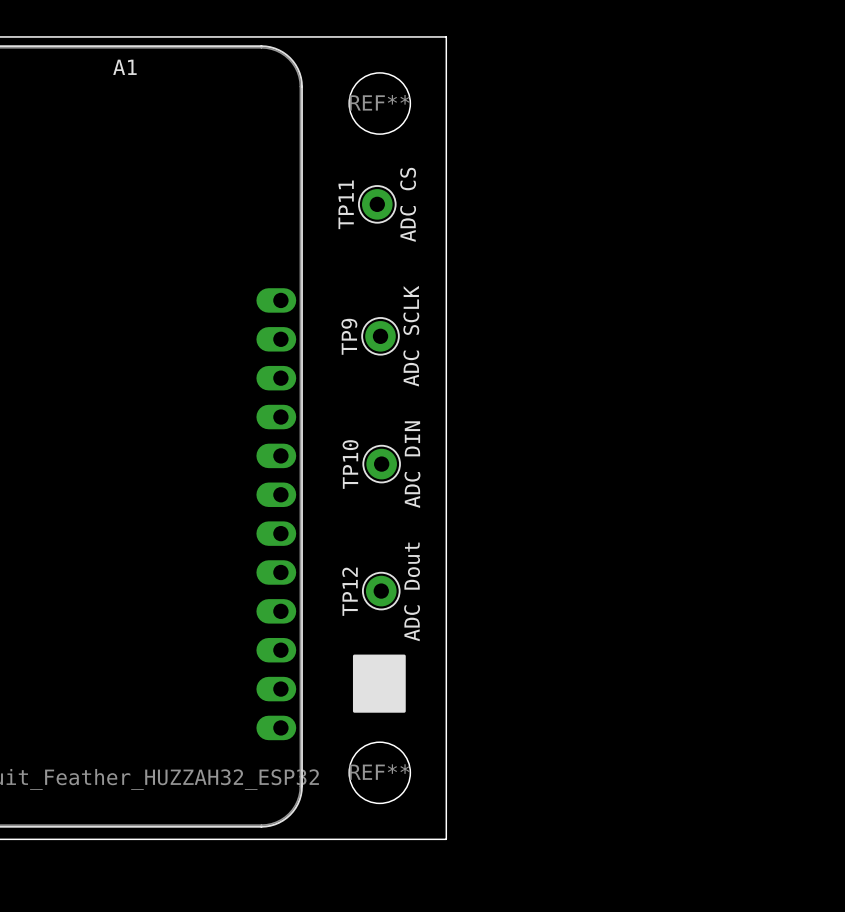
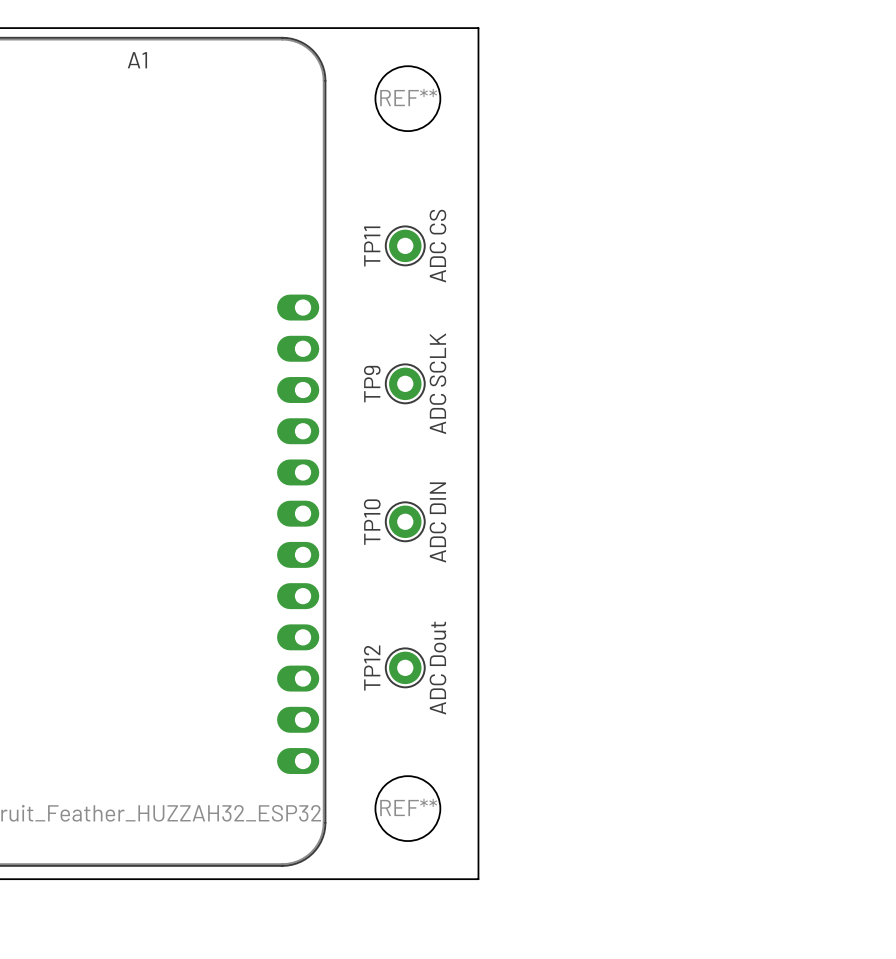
TP11 position: (377, 204) -> (405, 245)
TP9 position: (380, 336) -> (405, 383)
TP10 position: (381, 464) -> (405, 521)
TP12 position: (381, 591) -> (405, 667)
drawing: [352, 654, 406, 713] -> none

